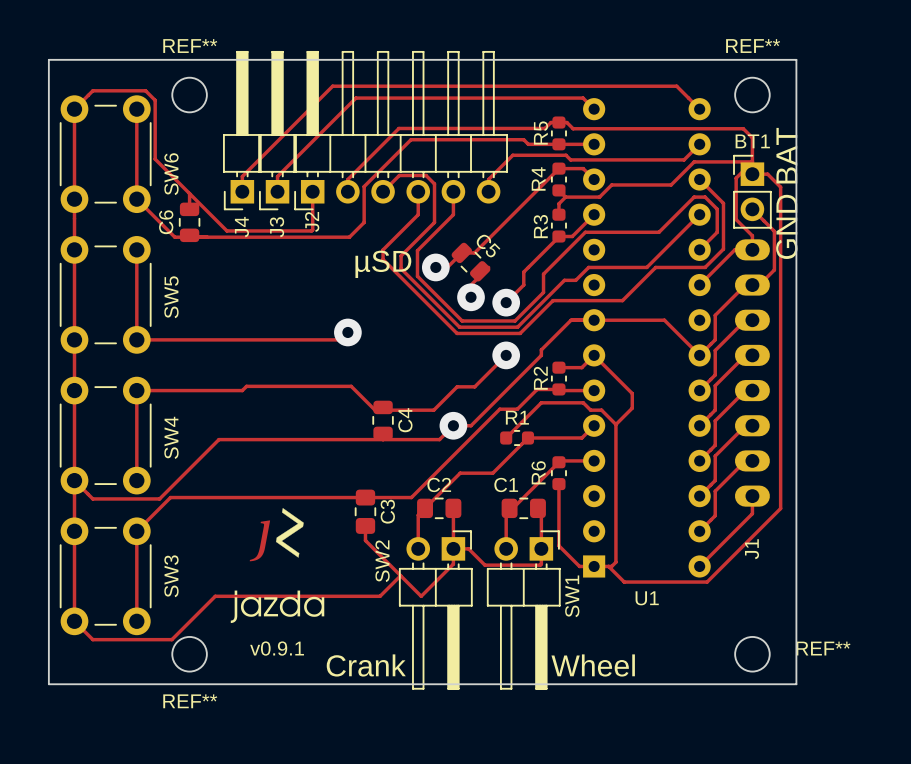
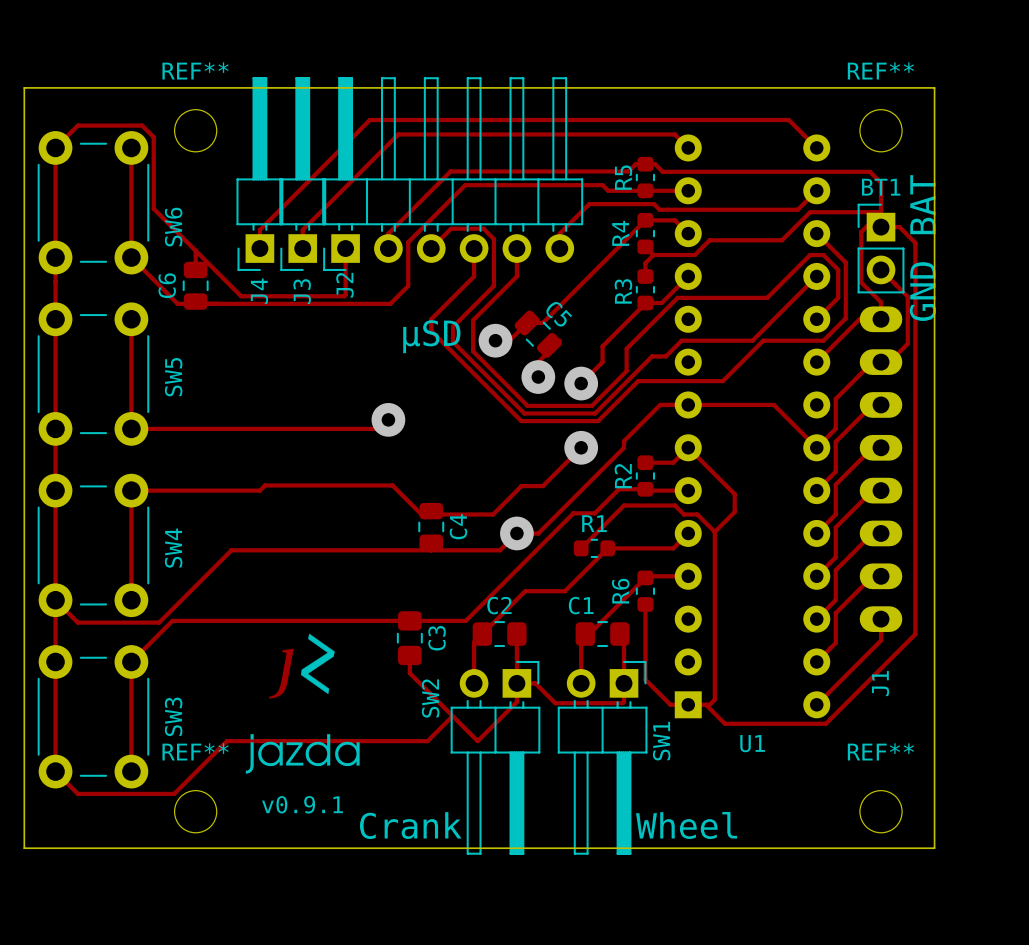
REF** name position: REF** (823, 648) -> REF** (880, 751)
REF** name position: REF** (190, 701) -> REF** (195, 751)

